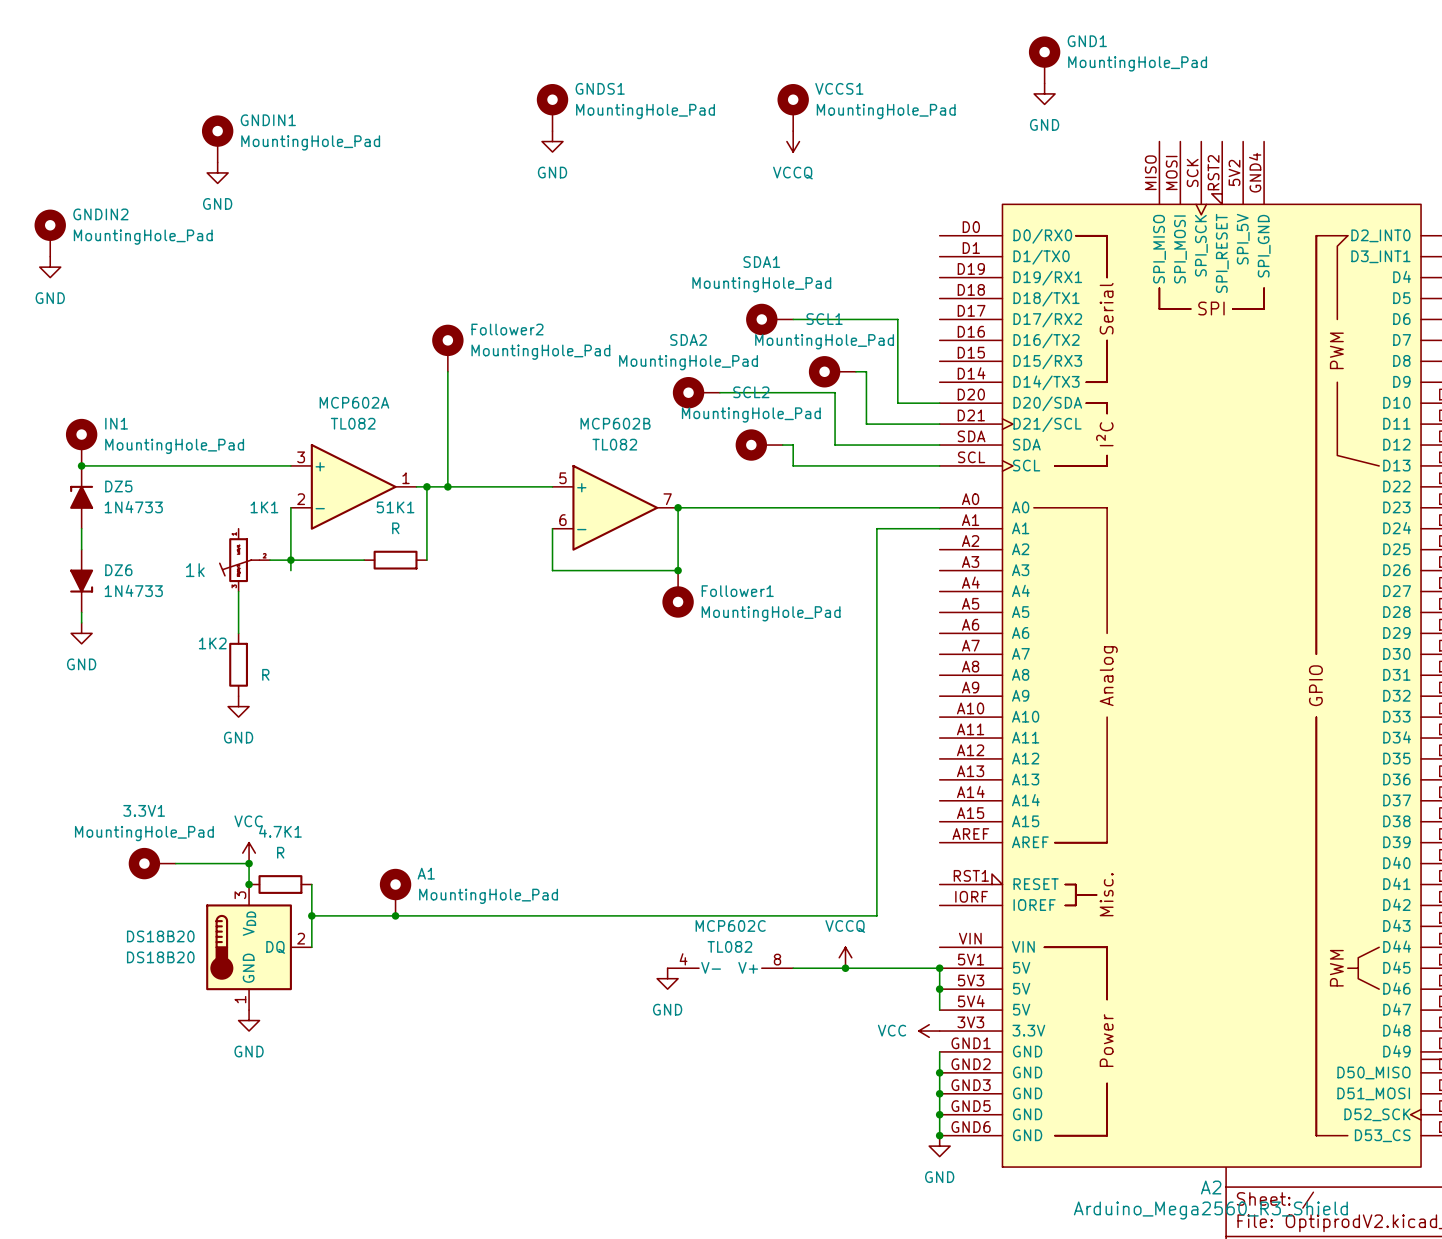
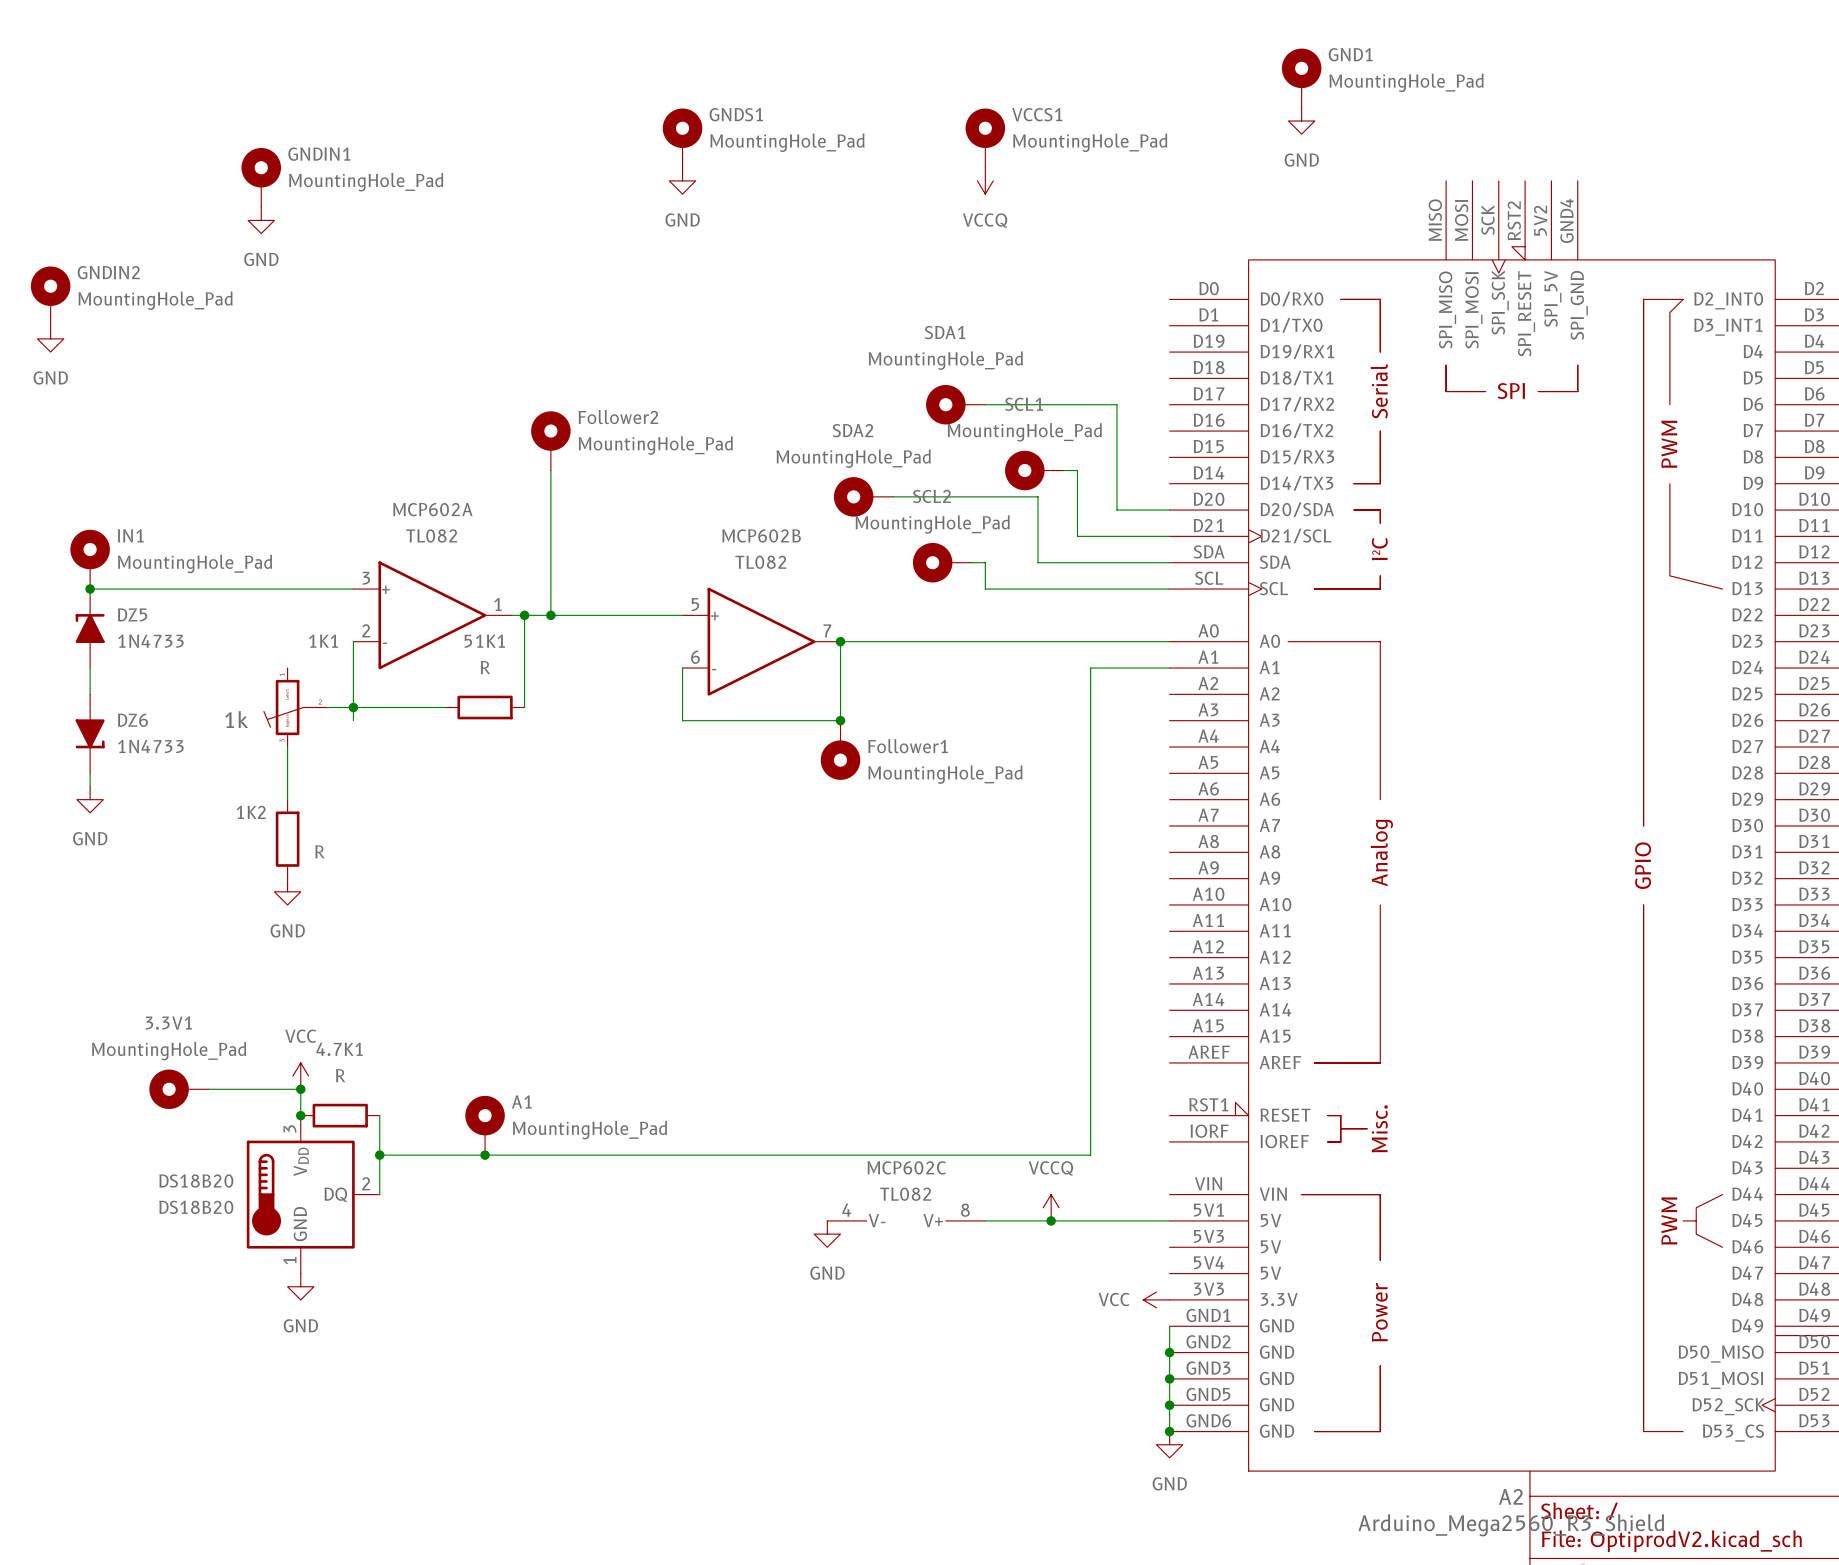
wire: (939, 968) (939, 1010) -> none
junction: (939, 968) -> none
junction: (939, 989) -> none

